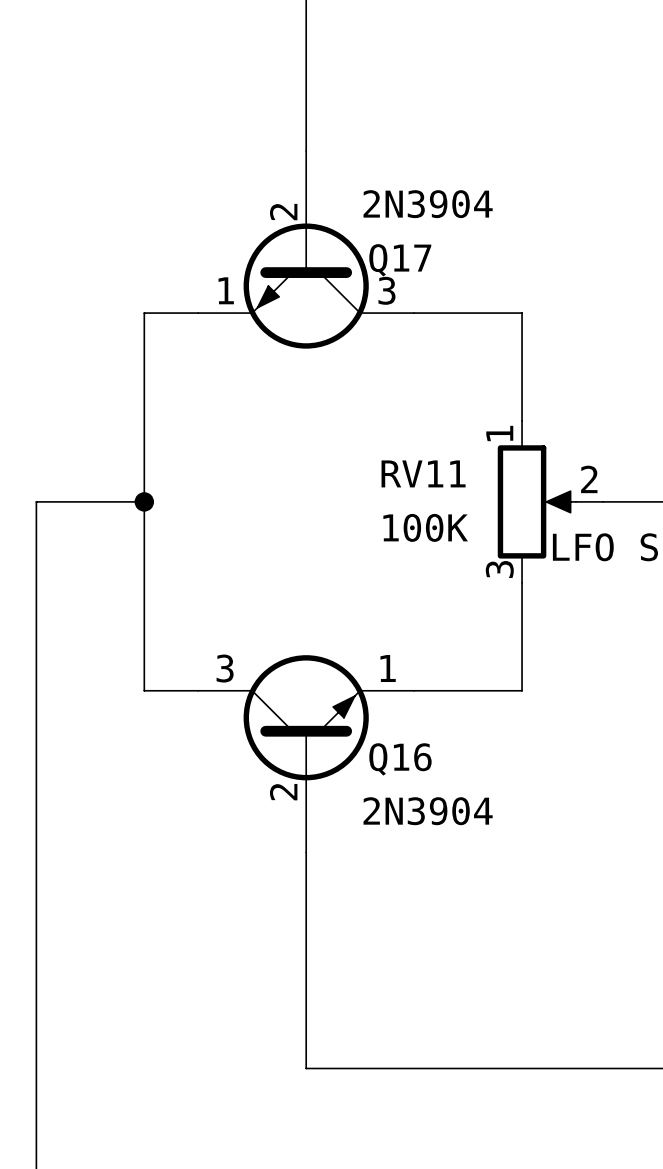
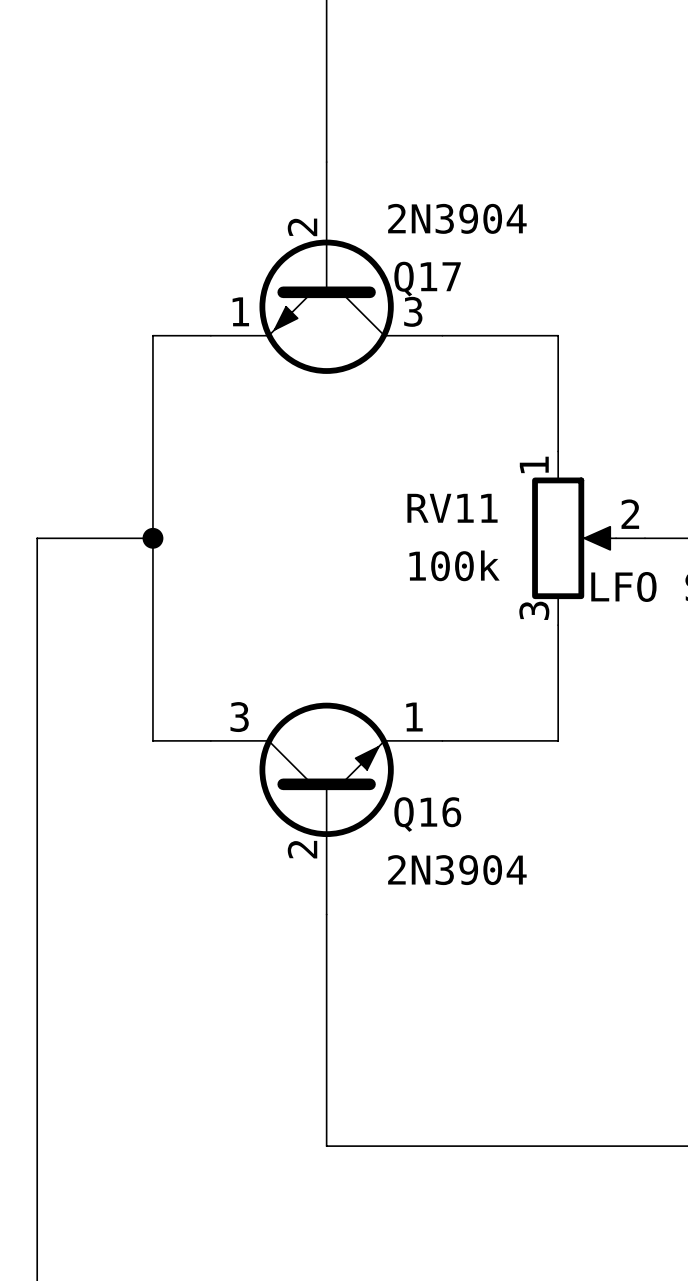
RV11 value: 100K (425, 527) -> 100k (454, 565)

